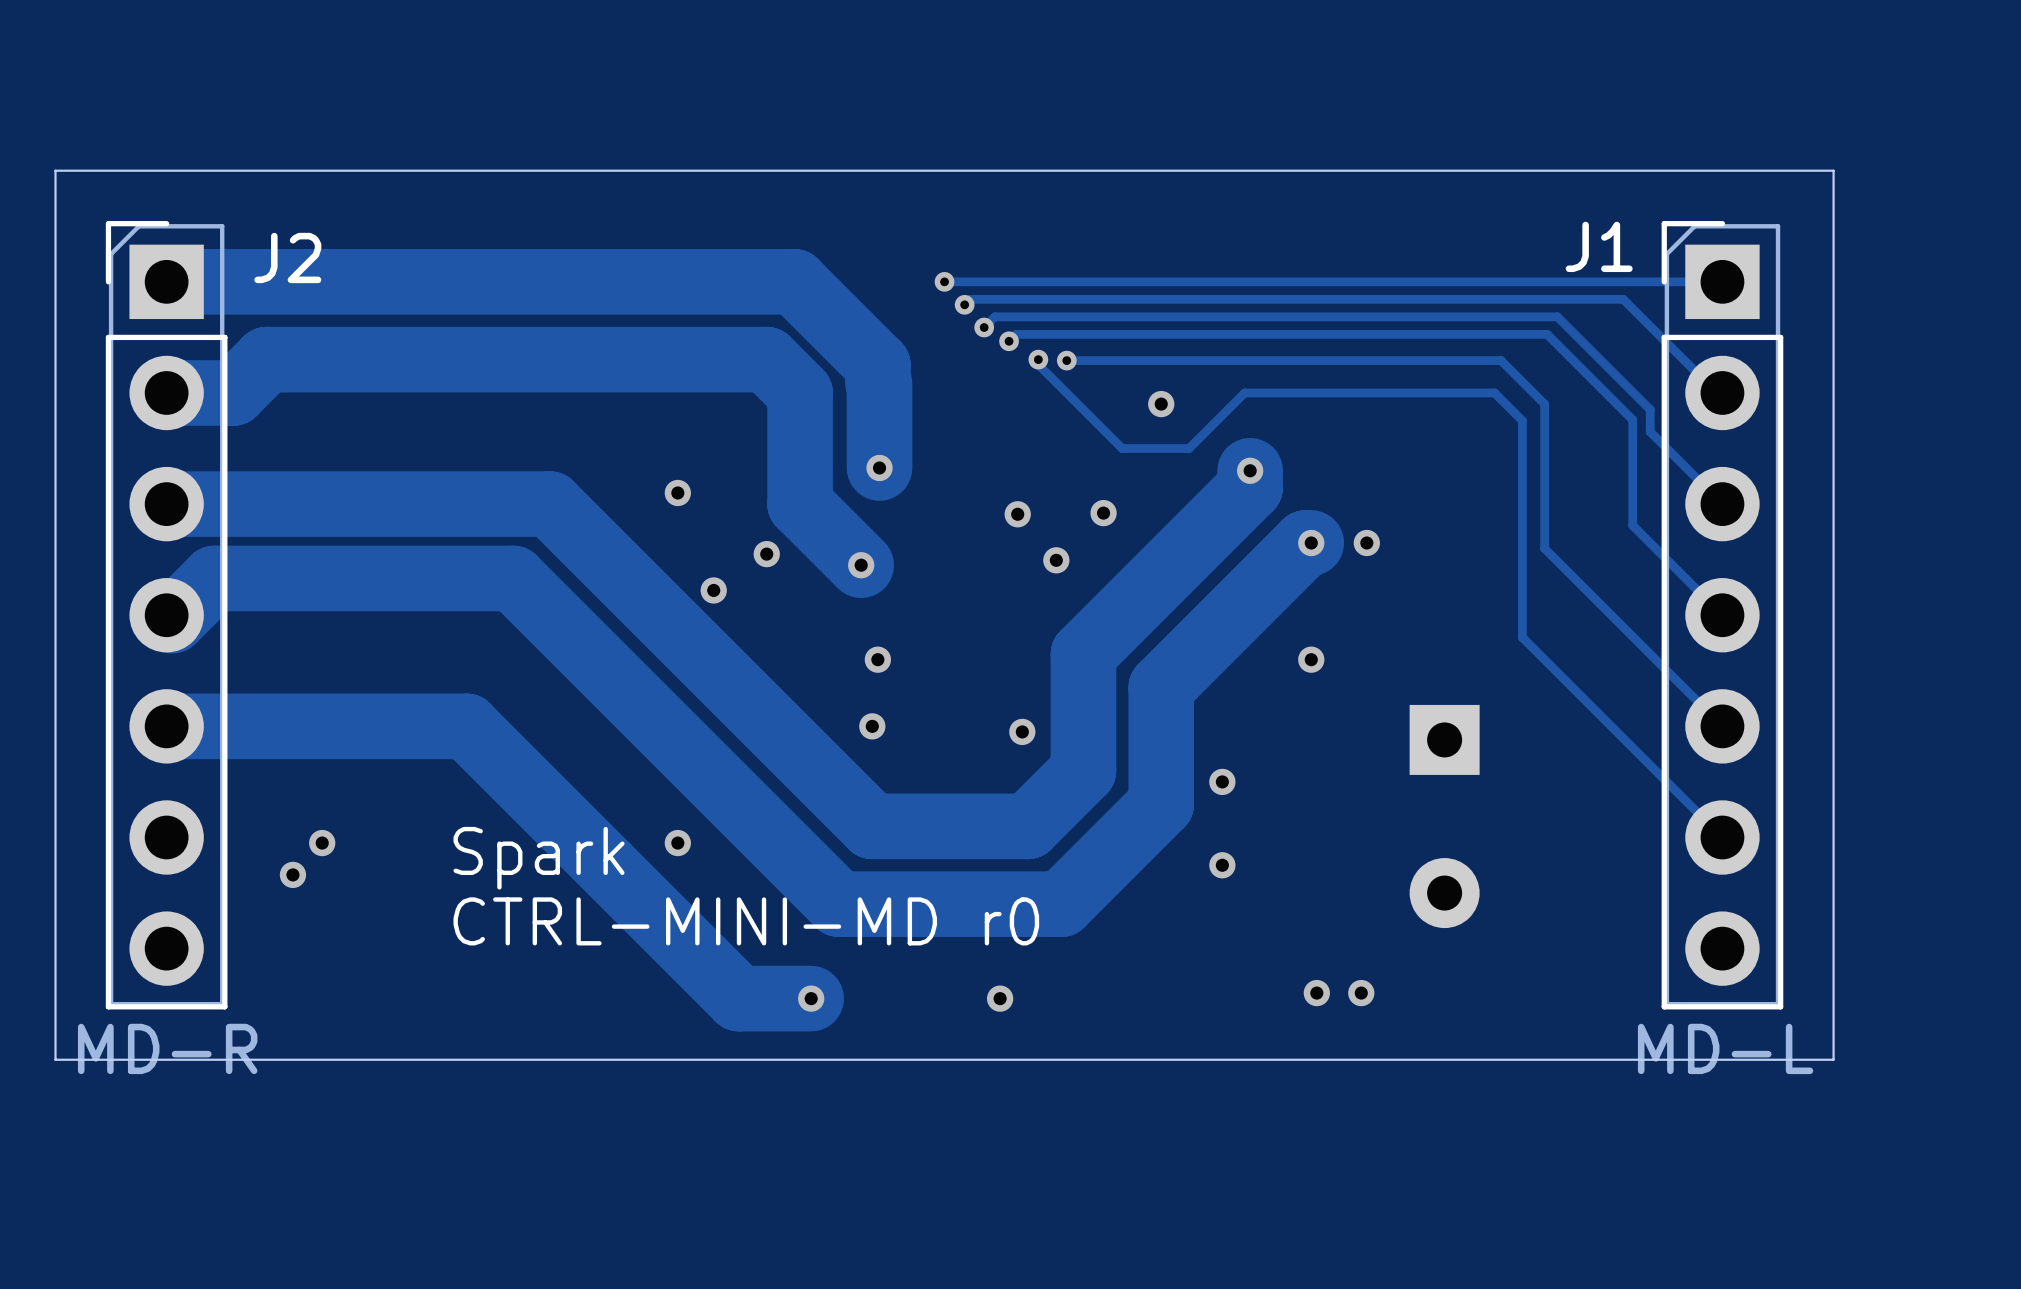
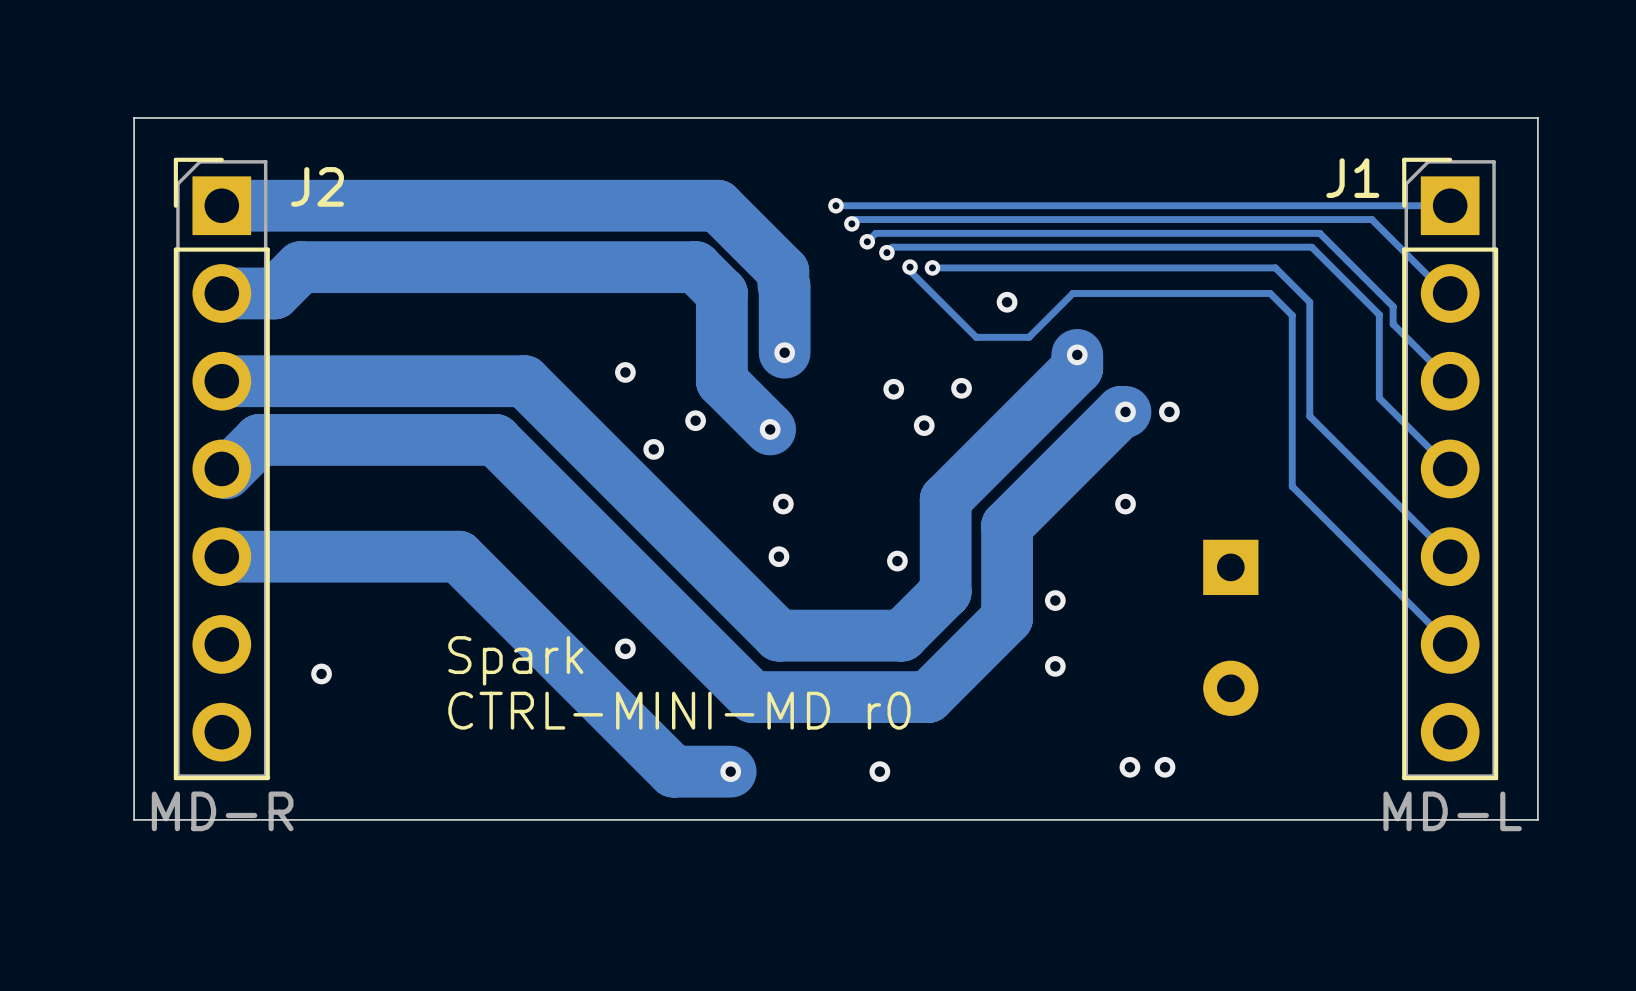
via: (322, 843) -> none

